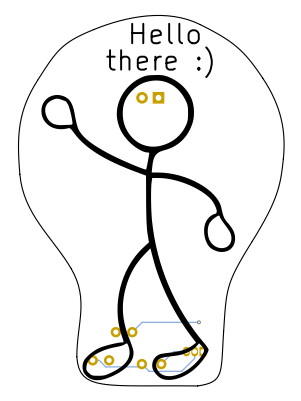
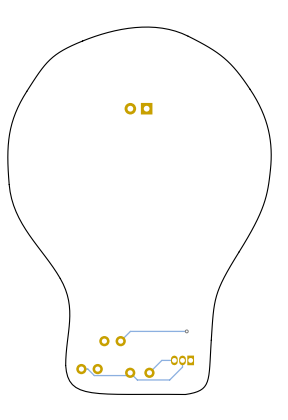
text: Hello (165, 33) -> none
text: there :) (159, 62) -> none
drawing: [41, 74, 236, 381] -> none

